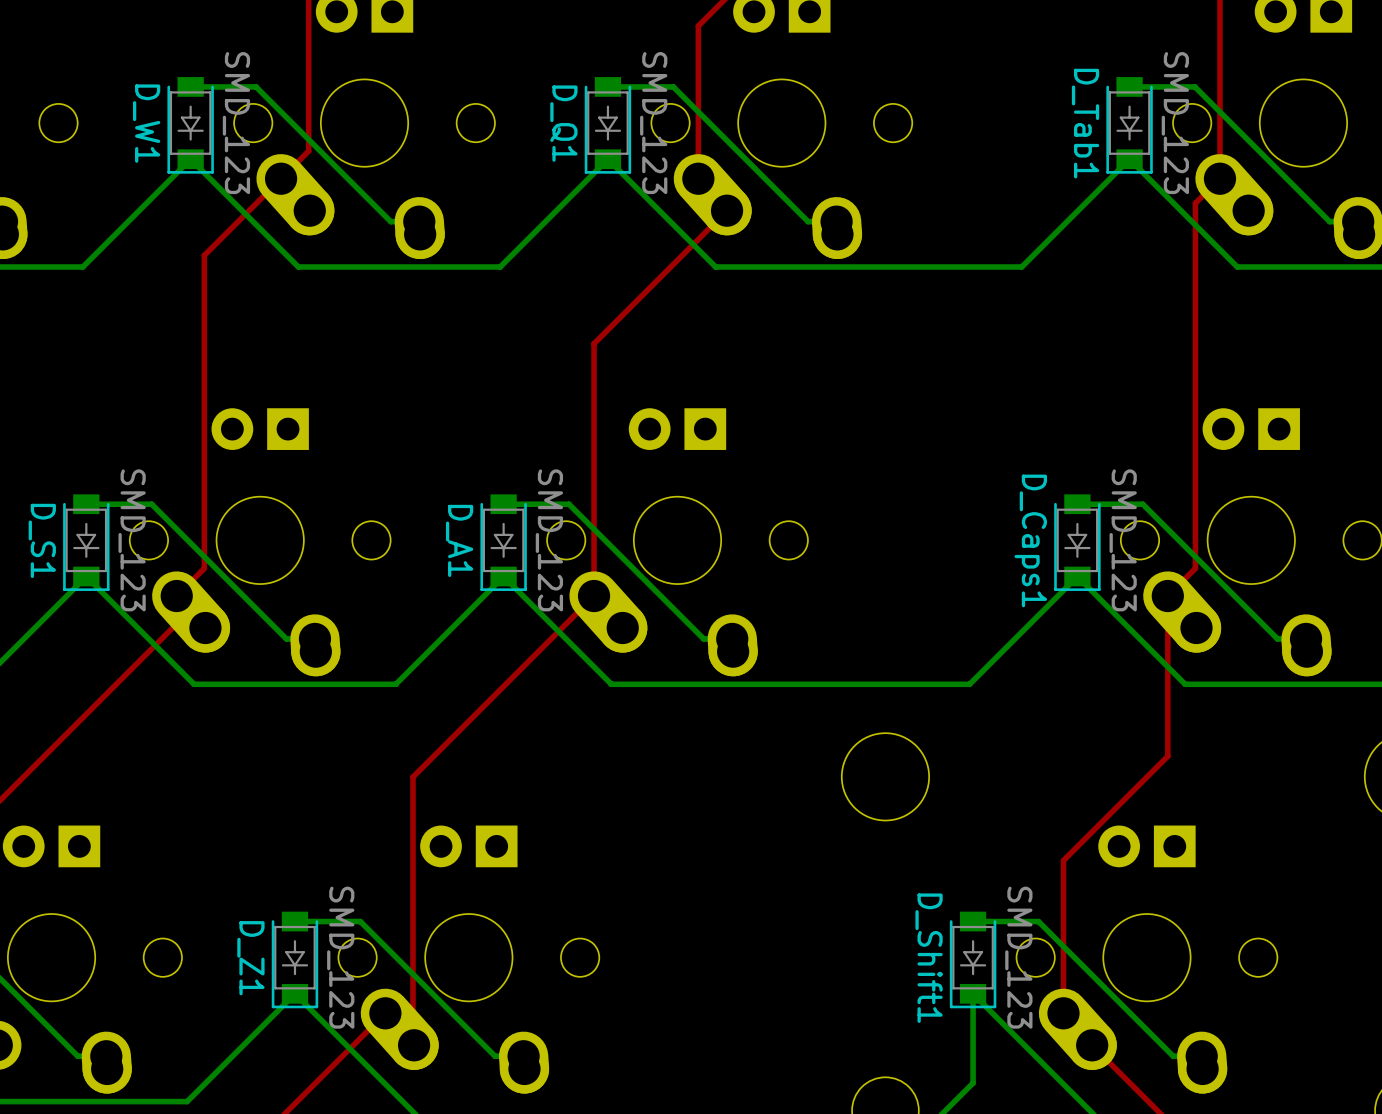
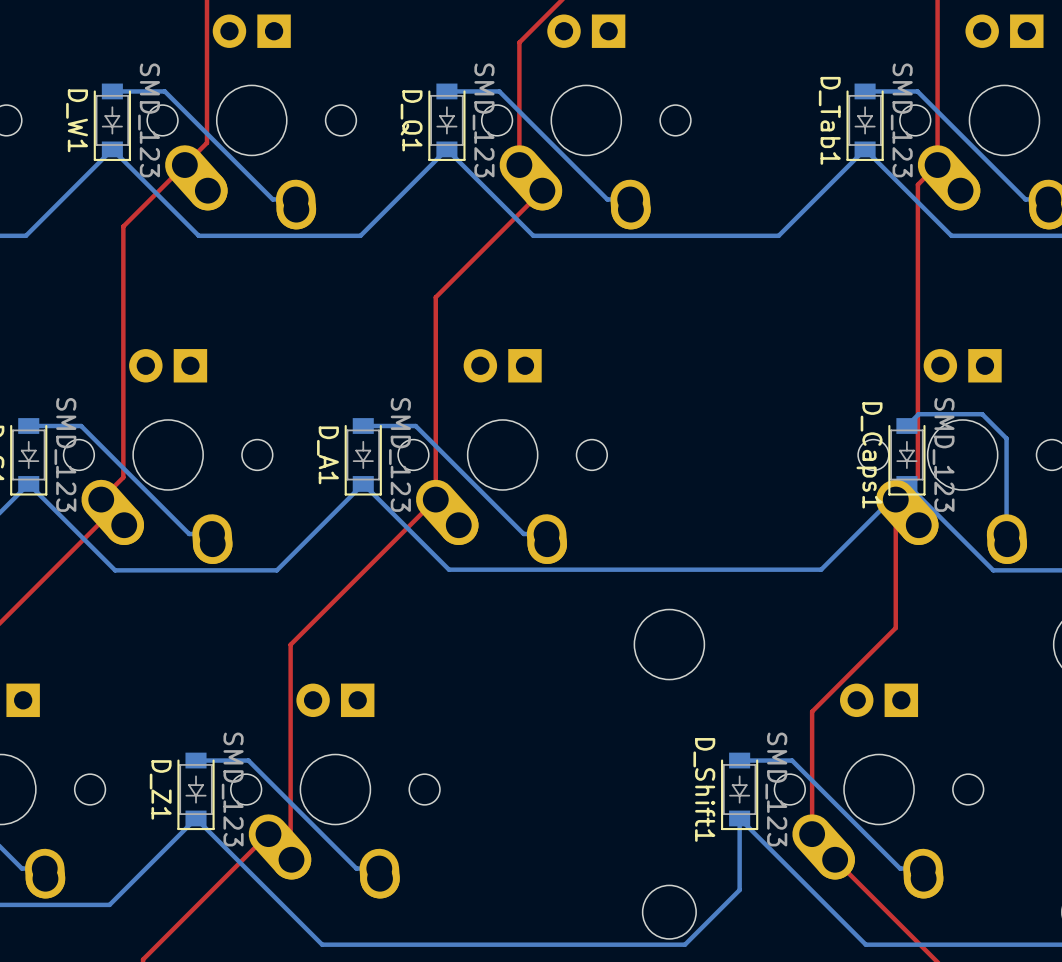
bottom track: (1077, 504) (1142, 504) (1277, 638) (1306, 638) -> (906, 426) (918, 414) (982, 414) (1006, 438) (1006, 534)
D_Caps1 position: (1077, 542) -> (906, 456)
bottom track: (610, 683) (969, 684) (1077, 576) (1185, 684) (1289, 684) -> (449, 569) (821, 569) (906, 483) (993, 570)

